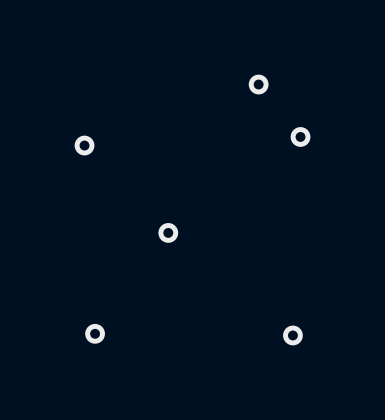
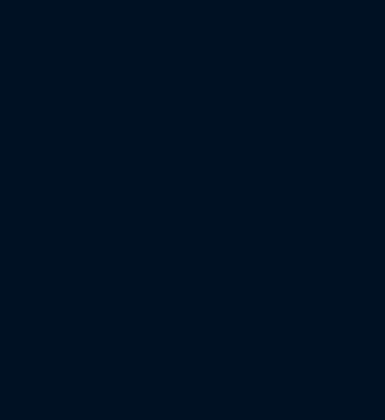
via: (258, 84) -> none
via: (300, 136) -> none
via: (84, 145) -> none
via: (168, 232) -> none
via: (95, 333) -> none
via: (292, 335) -> none

